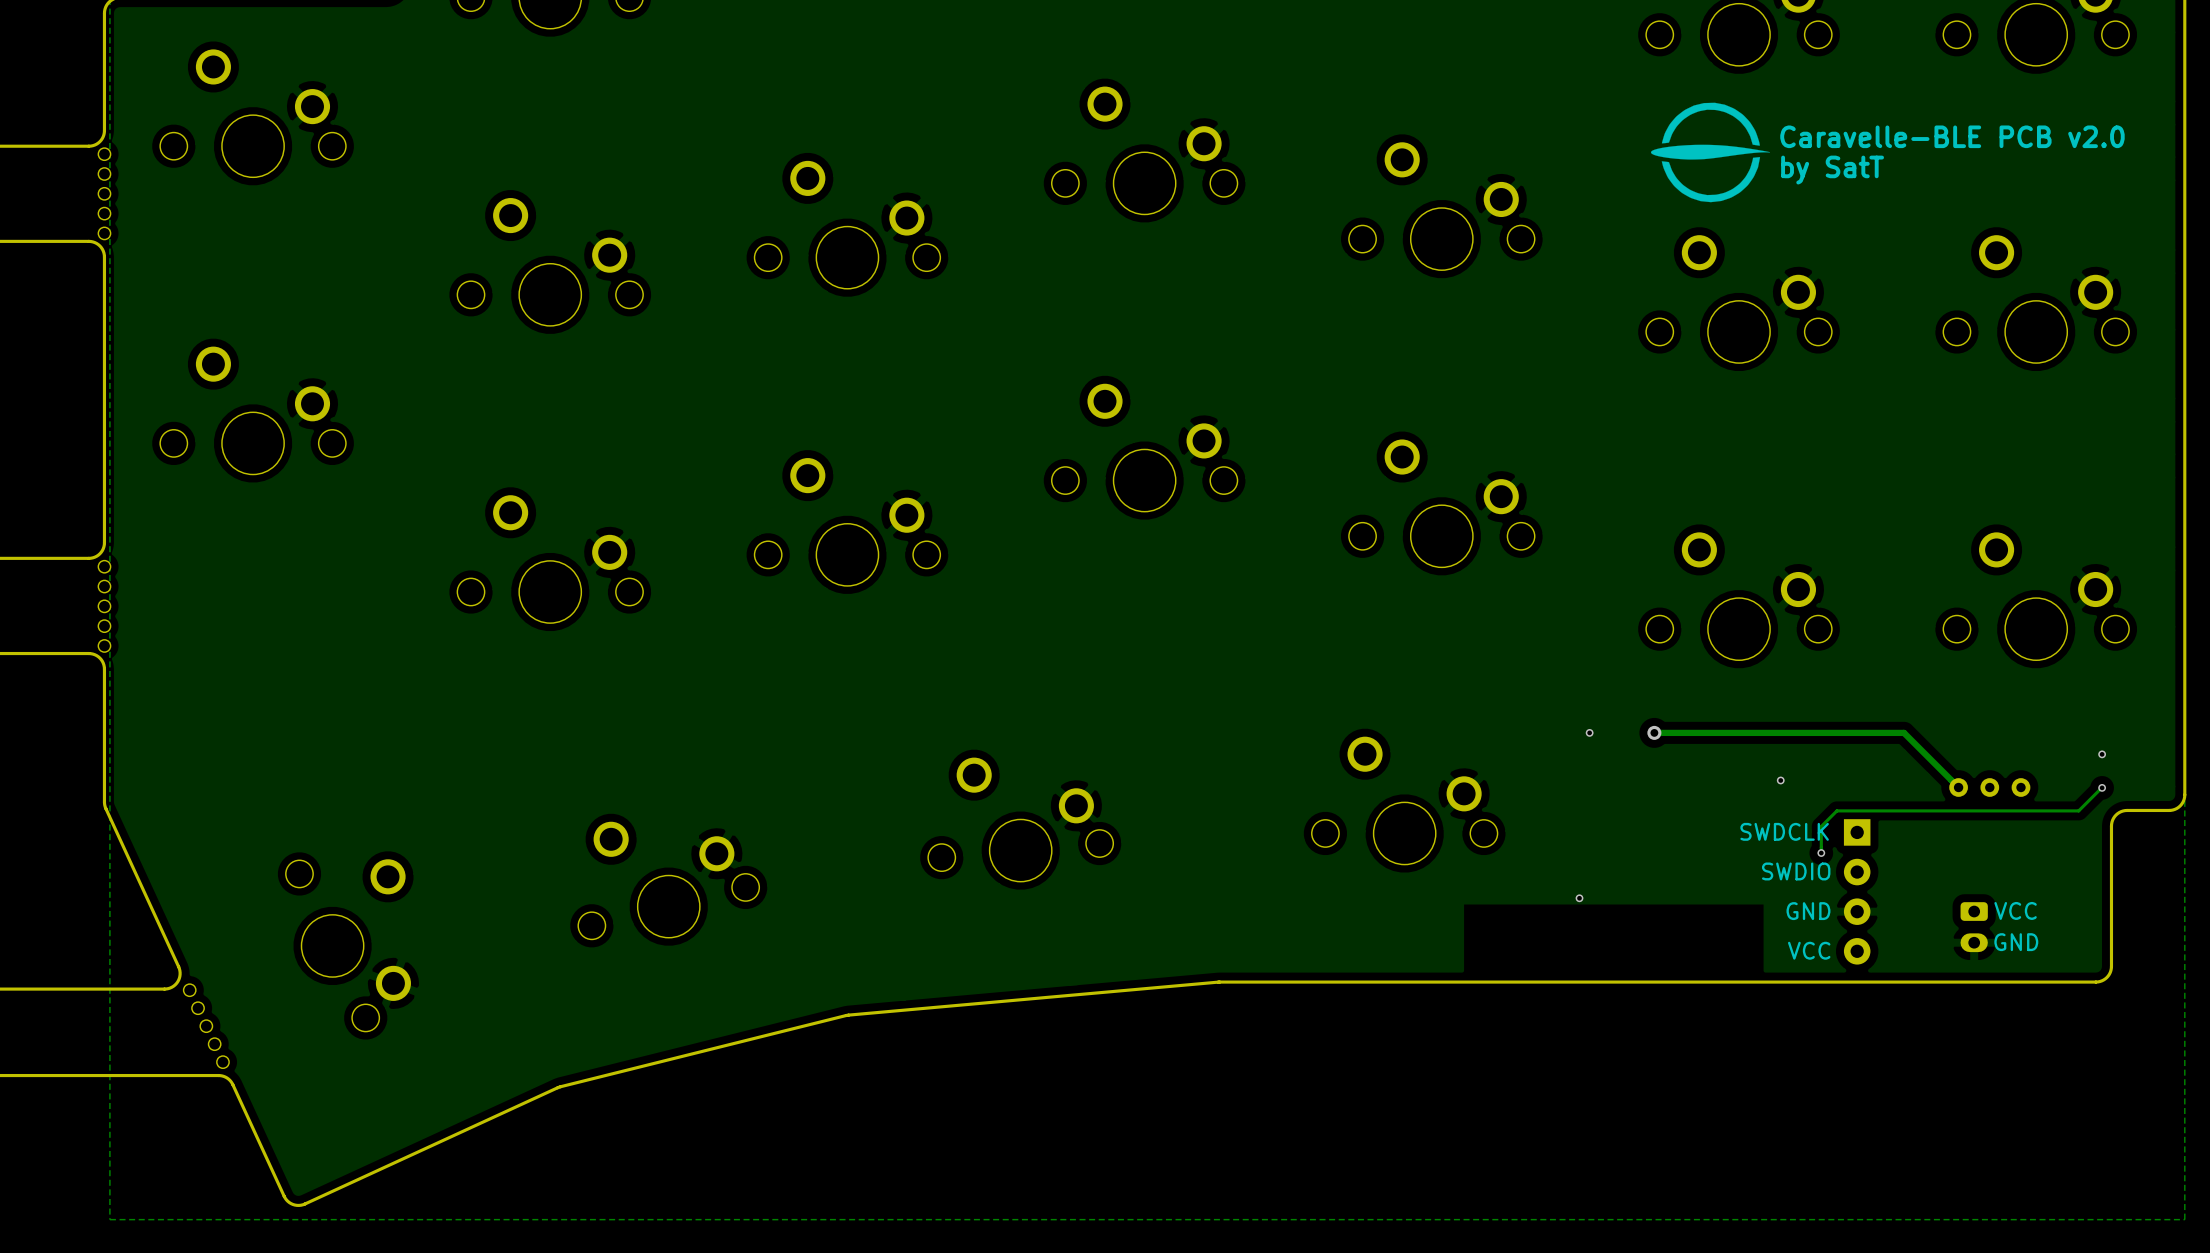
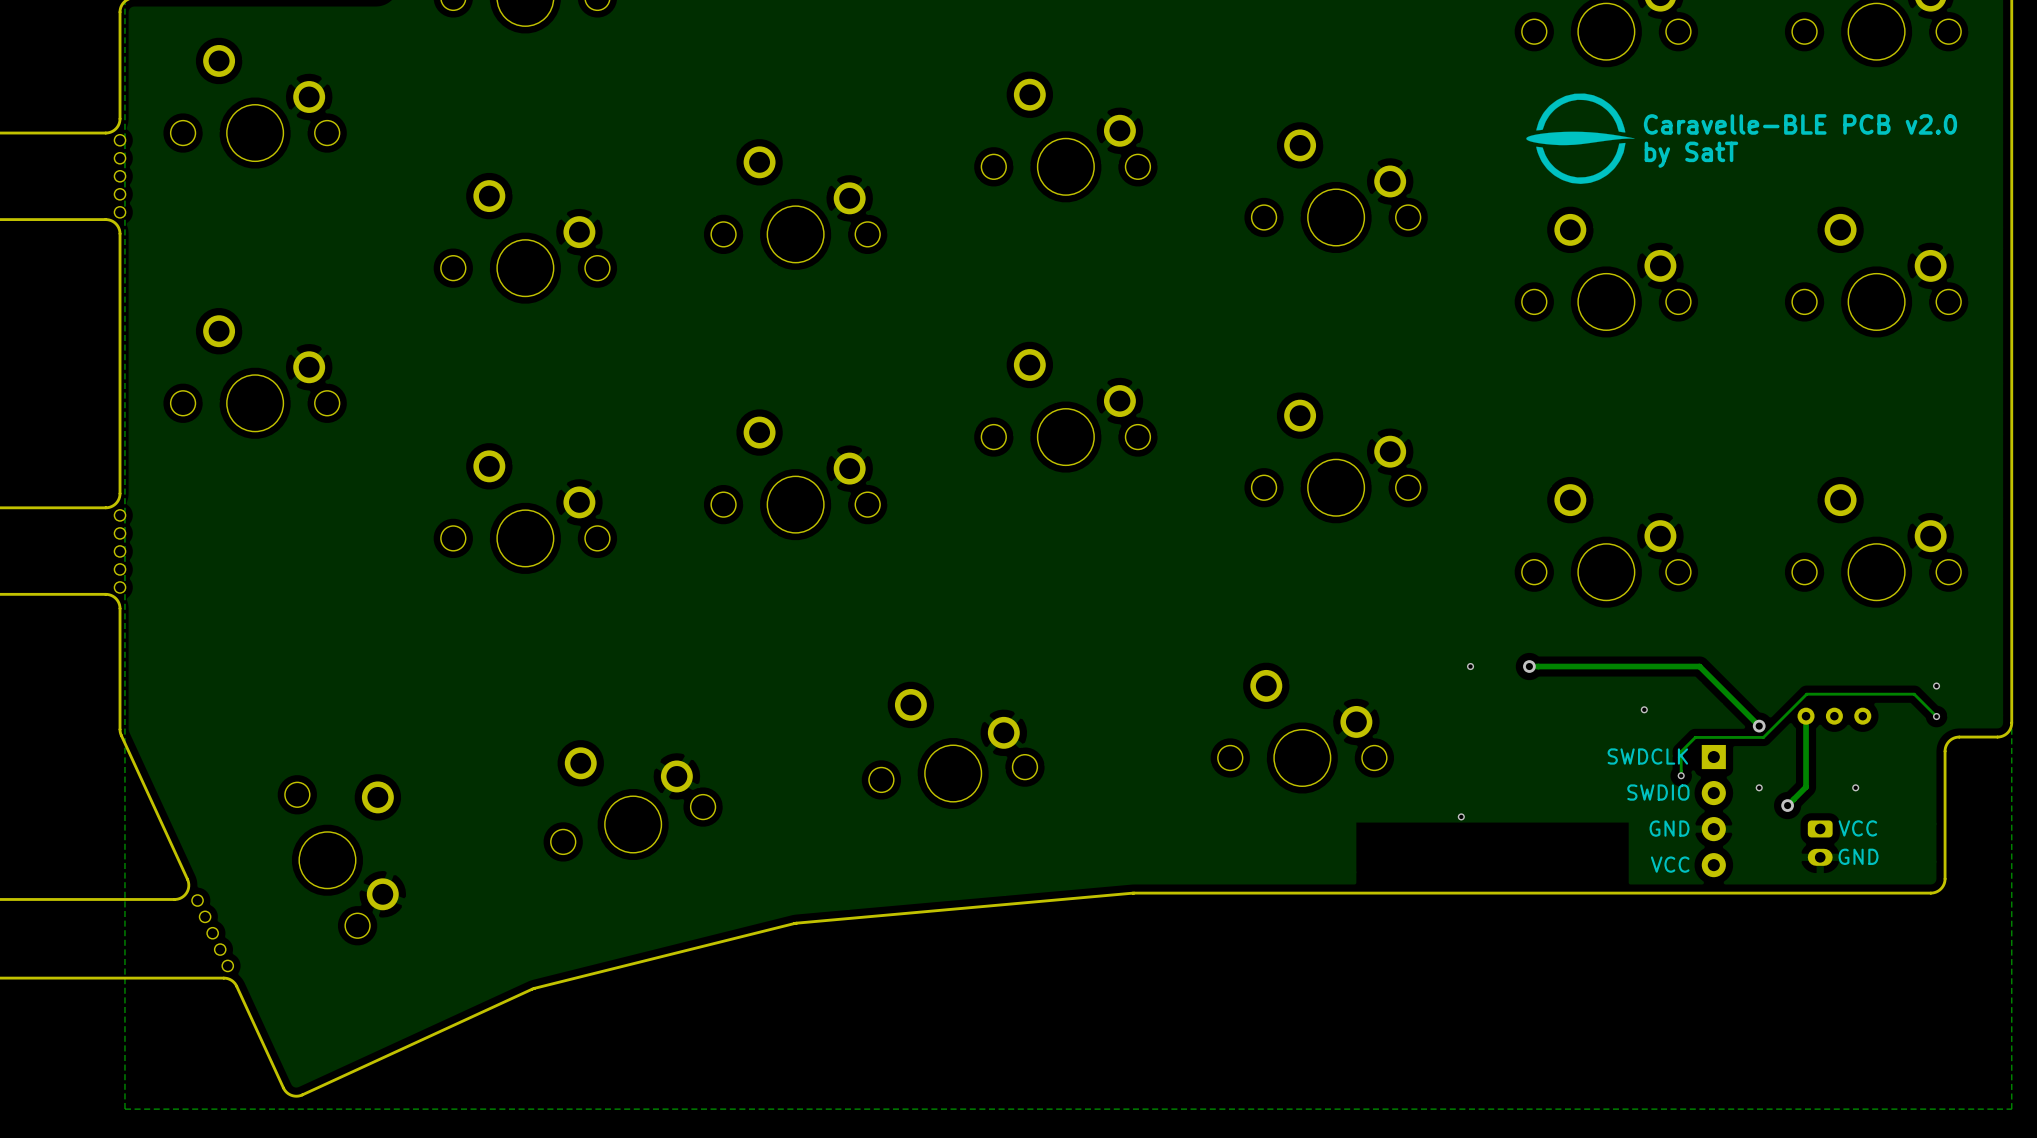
track: (1841, 732) (1903, 732) (1958, 787) -> (1699, 666) (1759, 726)
track: none -> (1806, 716) (1806, 787) (1787, 805)
track: (2102, 787) (2078, 810) (1911, 810) -> (1936, 716) (1914, 694) (1806, 694) (1763, 737)
via: none -> (1759, 726)
via: none -> (1759, 787)
via: none -> (1855, 787)
via: none -> (1787, 805)

